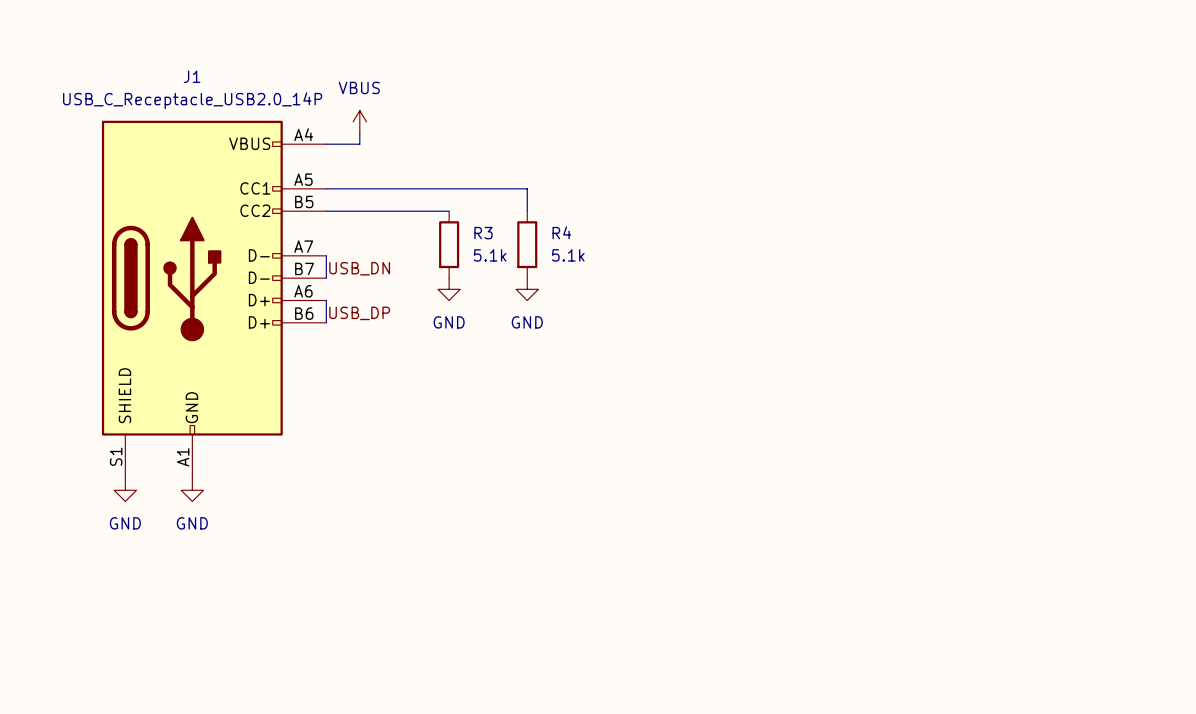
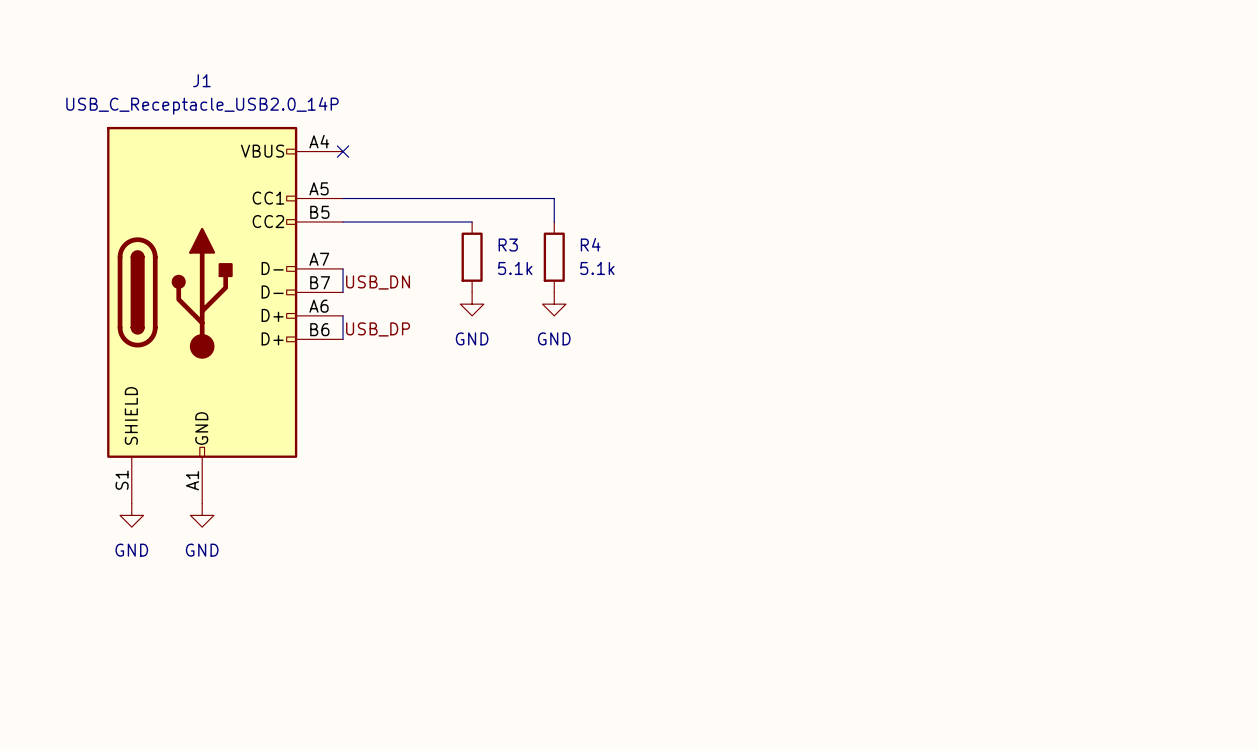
power symbol: VBUS (359, 121) -> none
wire: (359, 133) (359, 144) (326, 144) -> none
no-connect mark: none -> (343, 151)

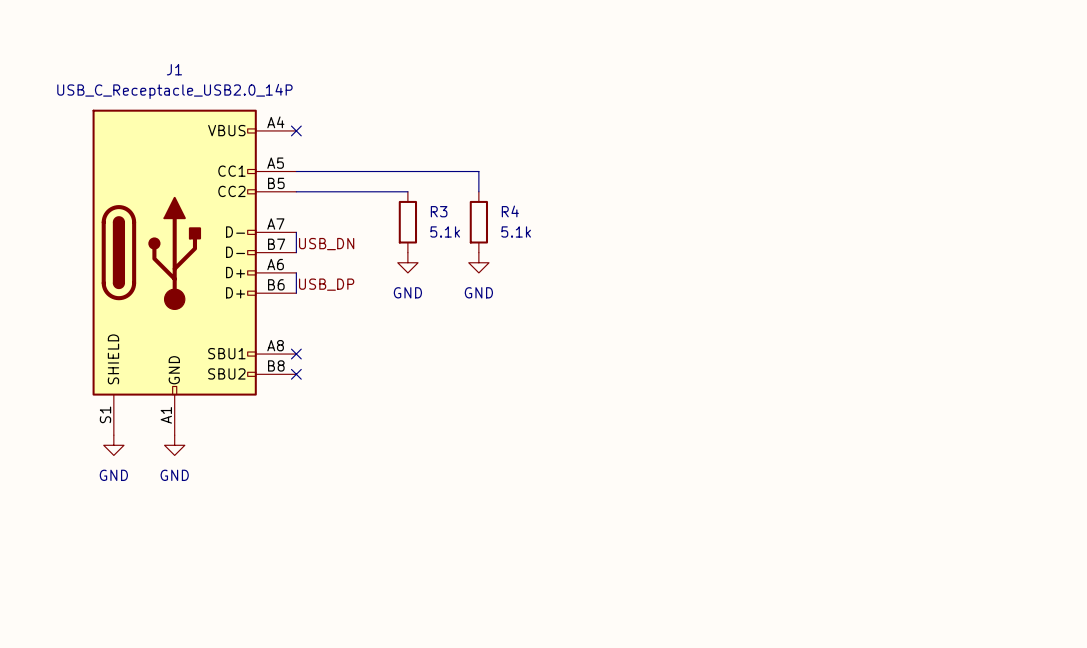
J1 symbol: [107, 126, 344, 504] -> [92, 109, 297, 436]
no-connect mark: none -> (296, 354)
no-connect mark: none -> (296, 374)

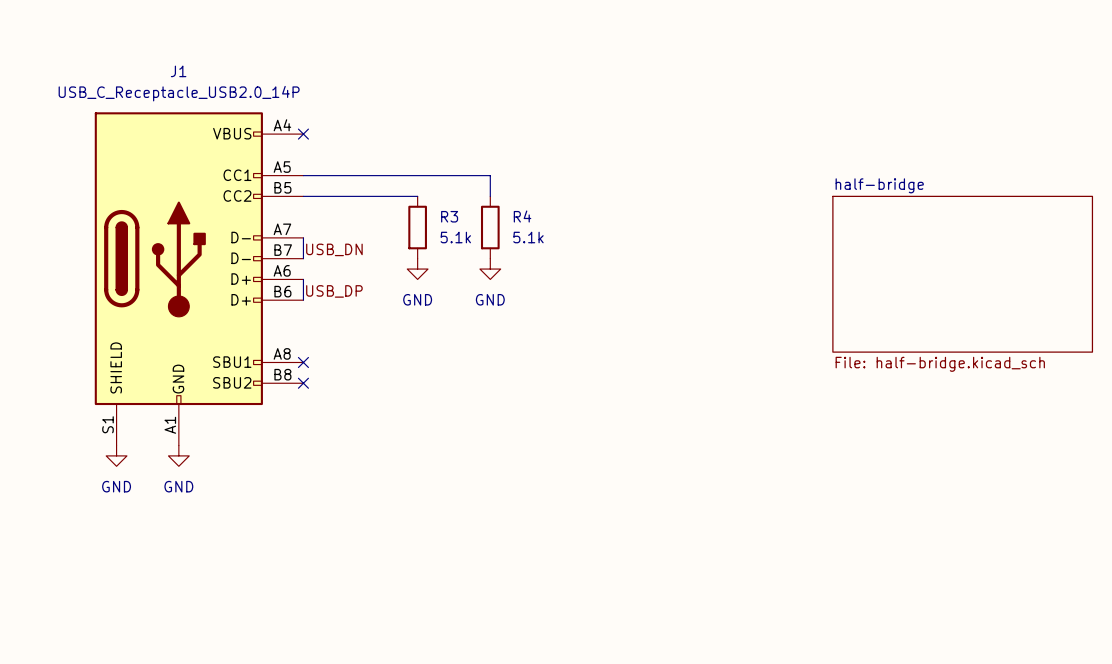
sheet half-bridge: none -> File: half-bridge.kicad_sch (962, 274)

